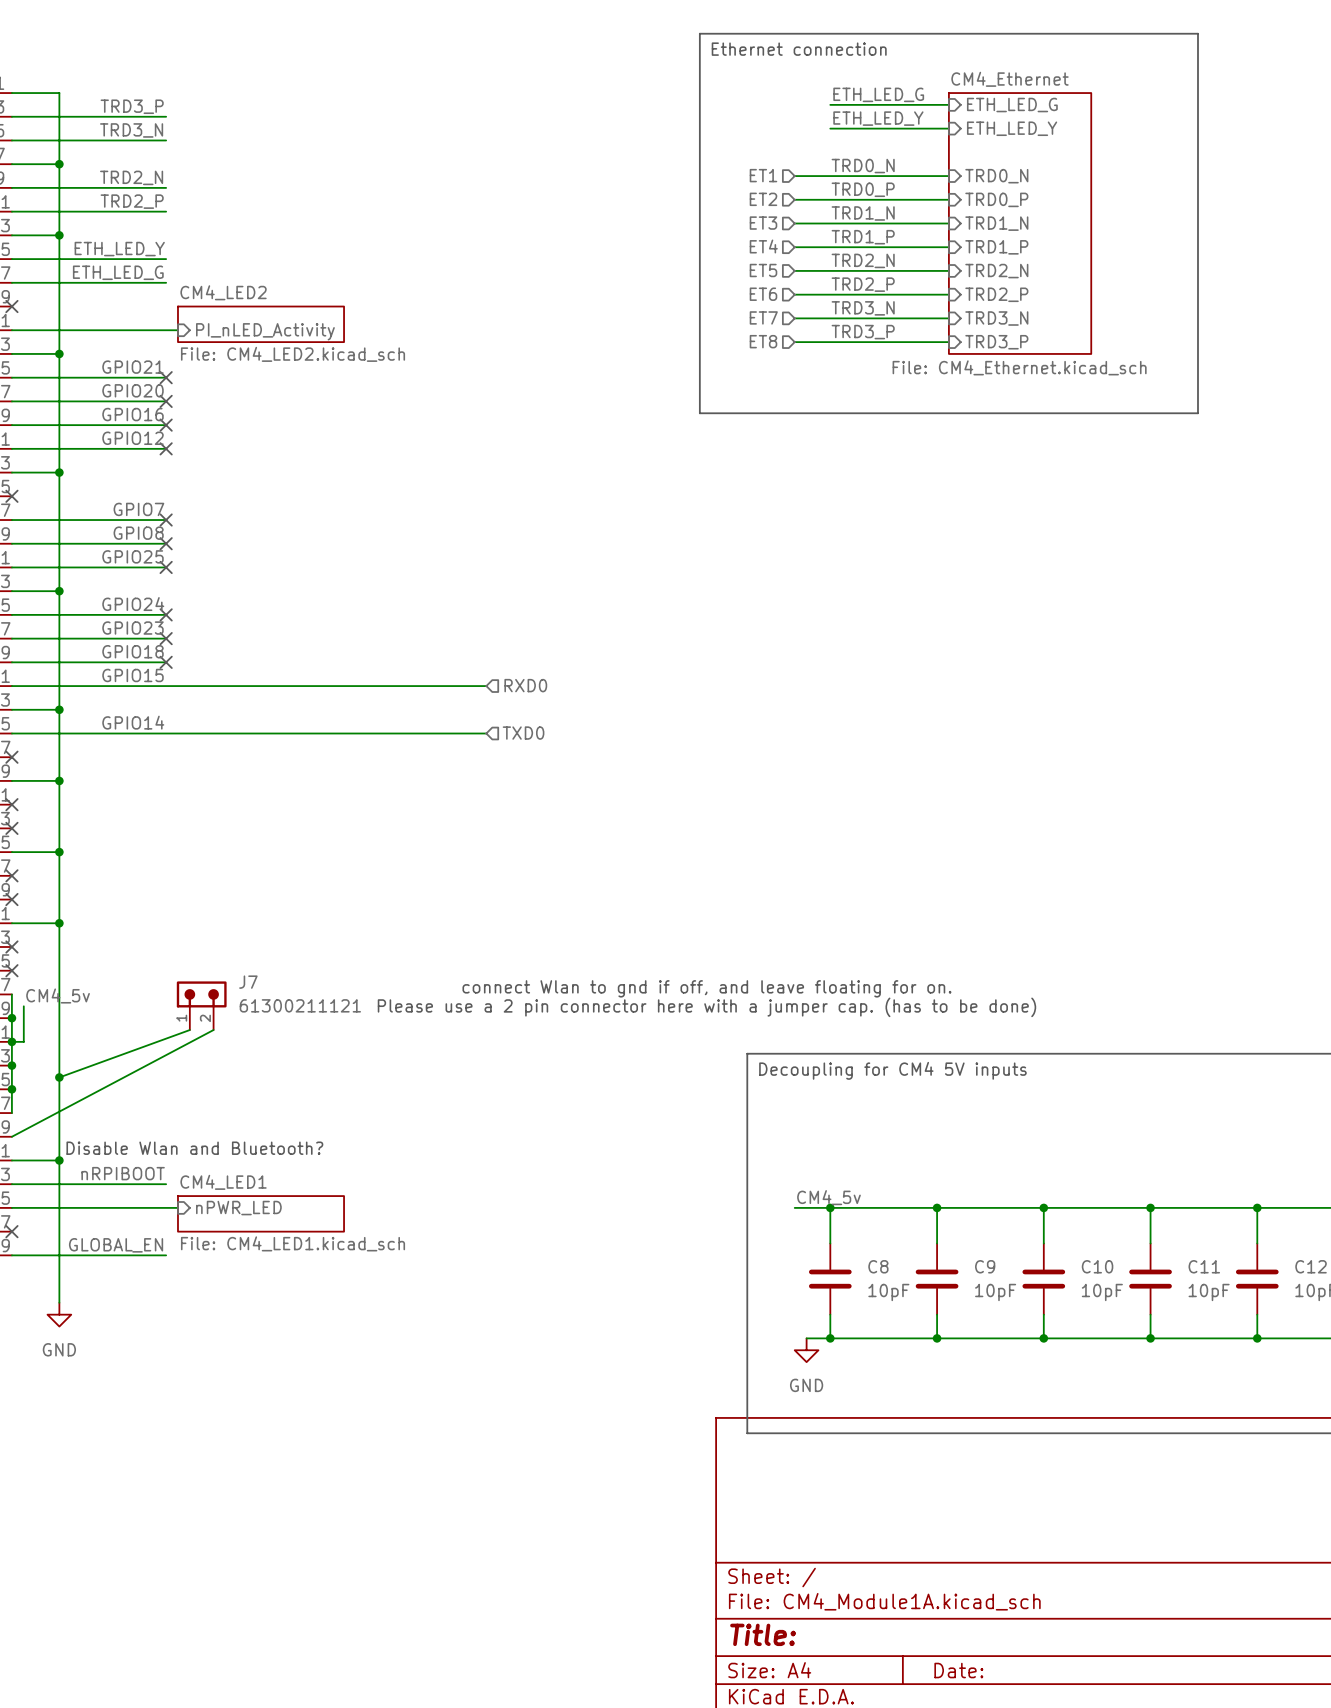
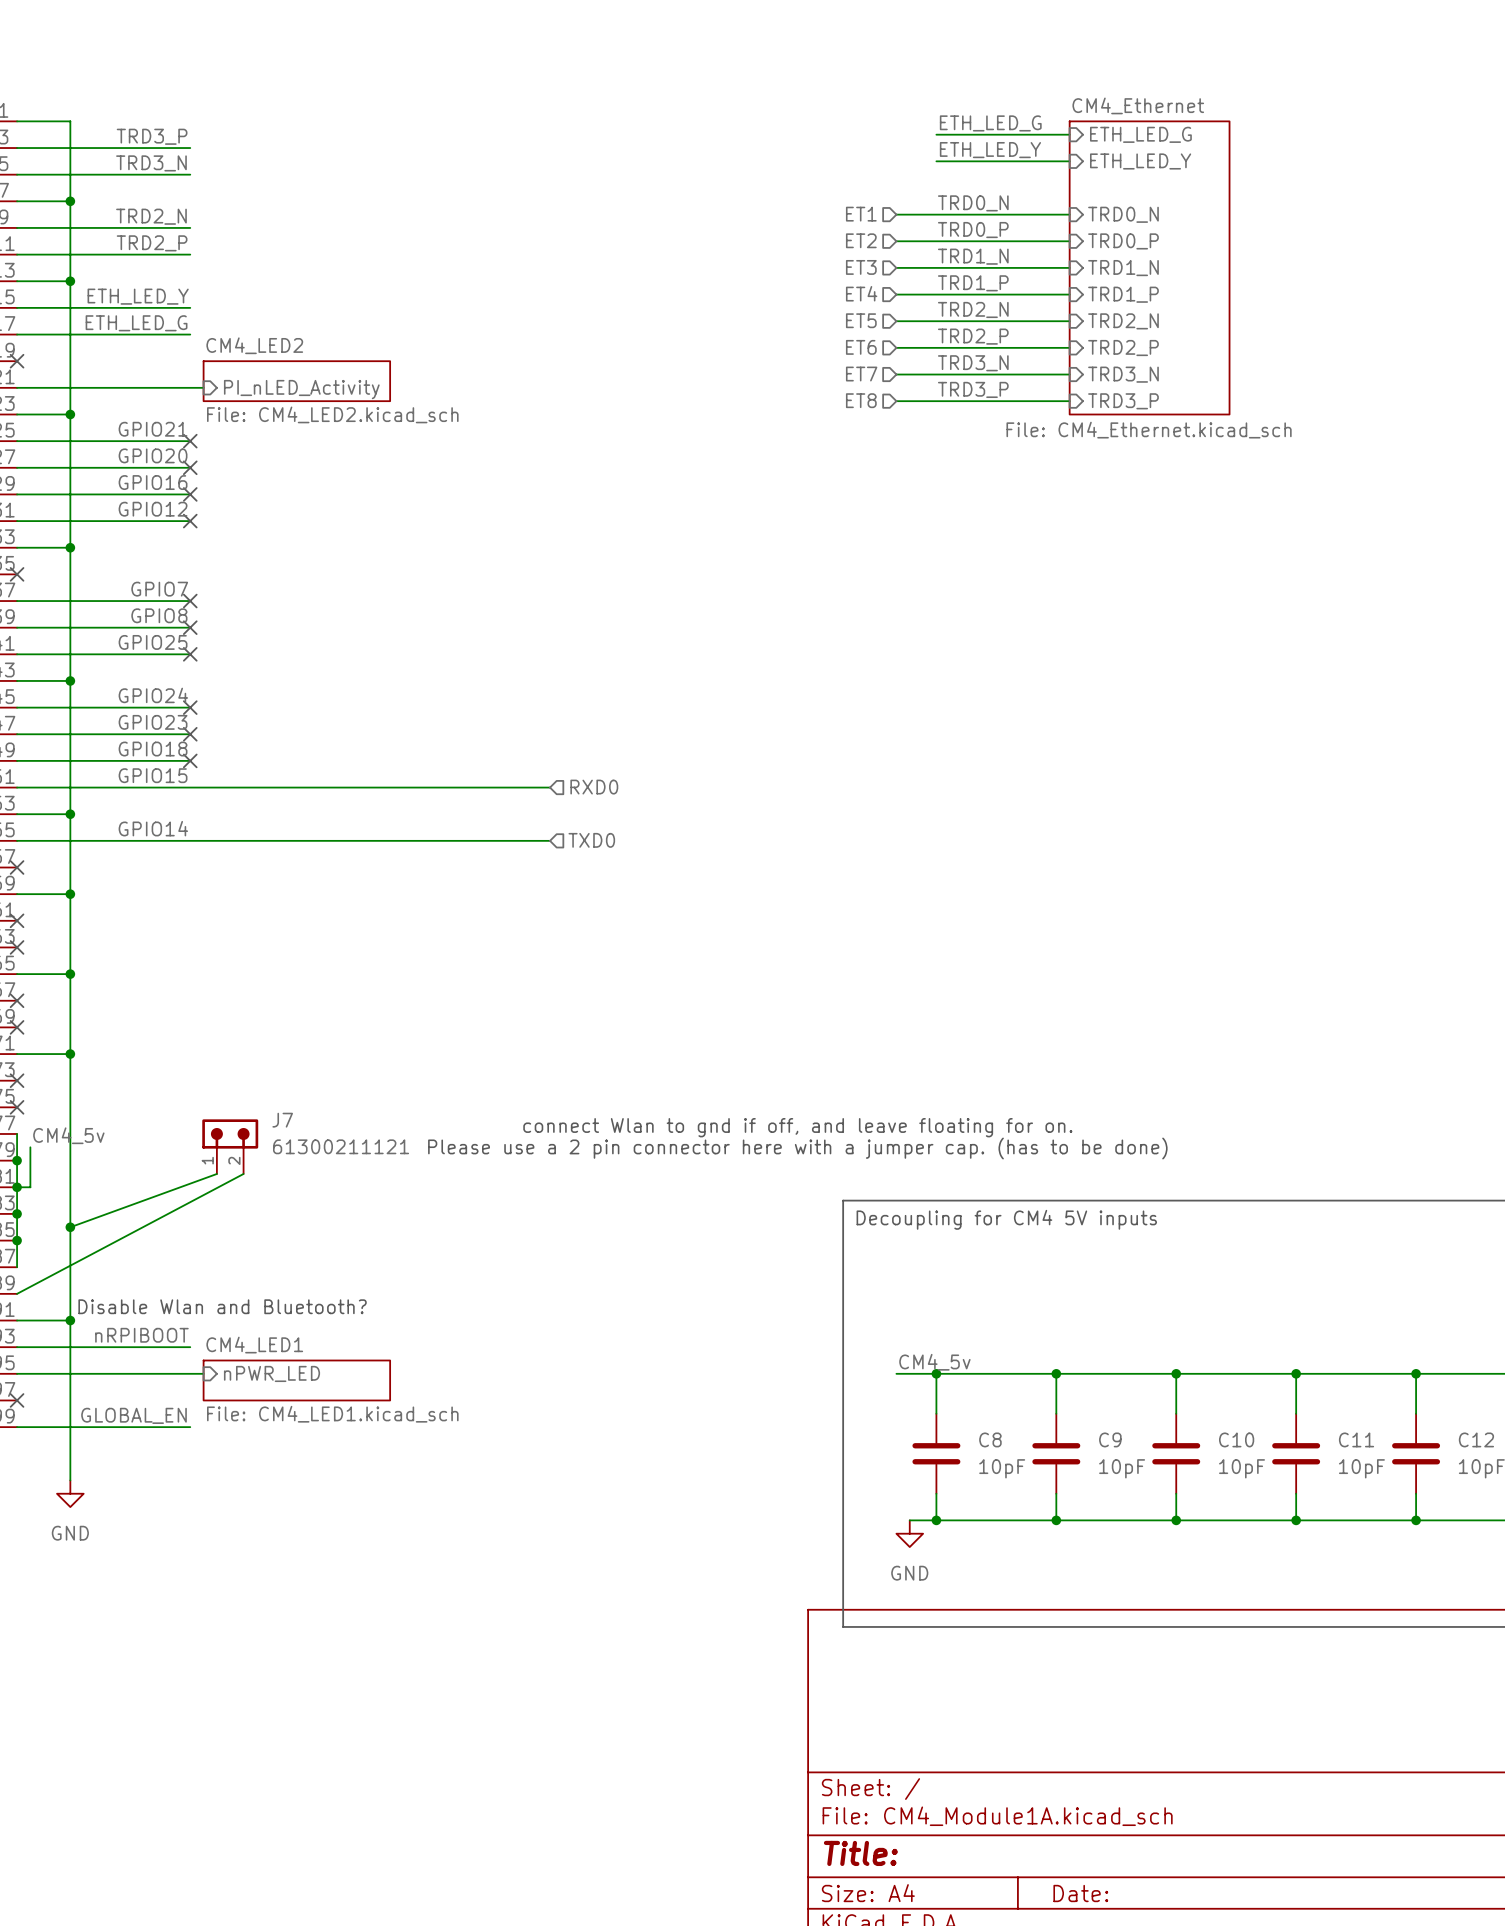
line: (699, 33) (1197, 33) (1197, 413) (699, 413) (699, 33) -> none
text: Ethernet connection (799, 49) -> none

